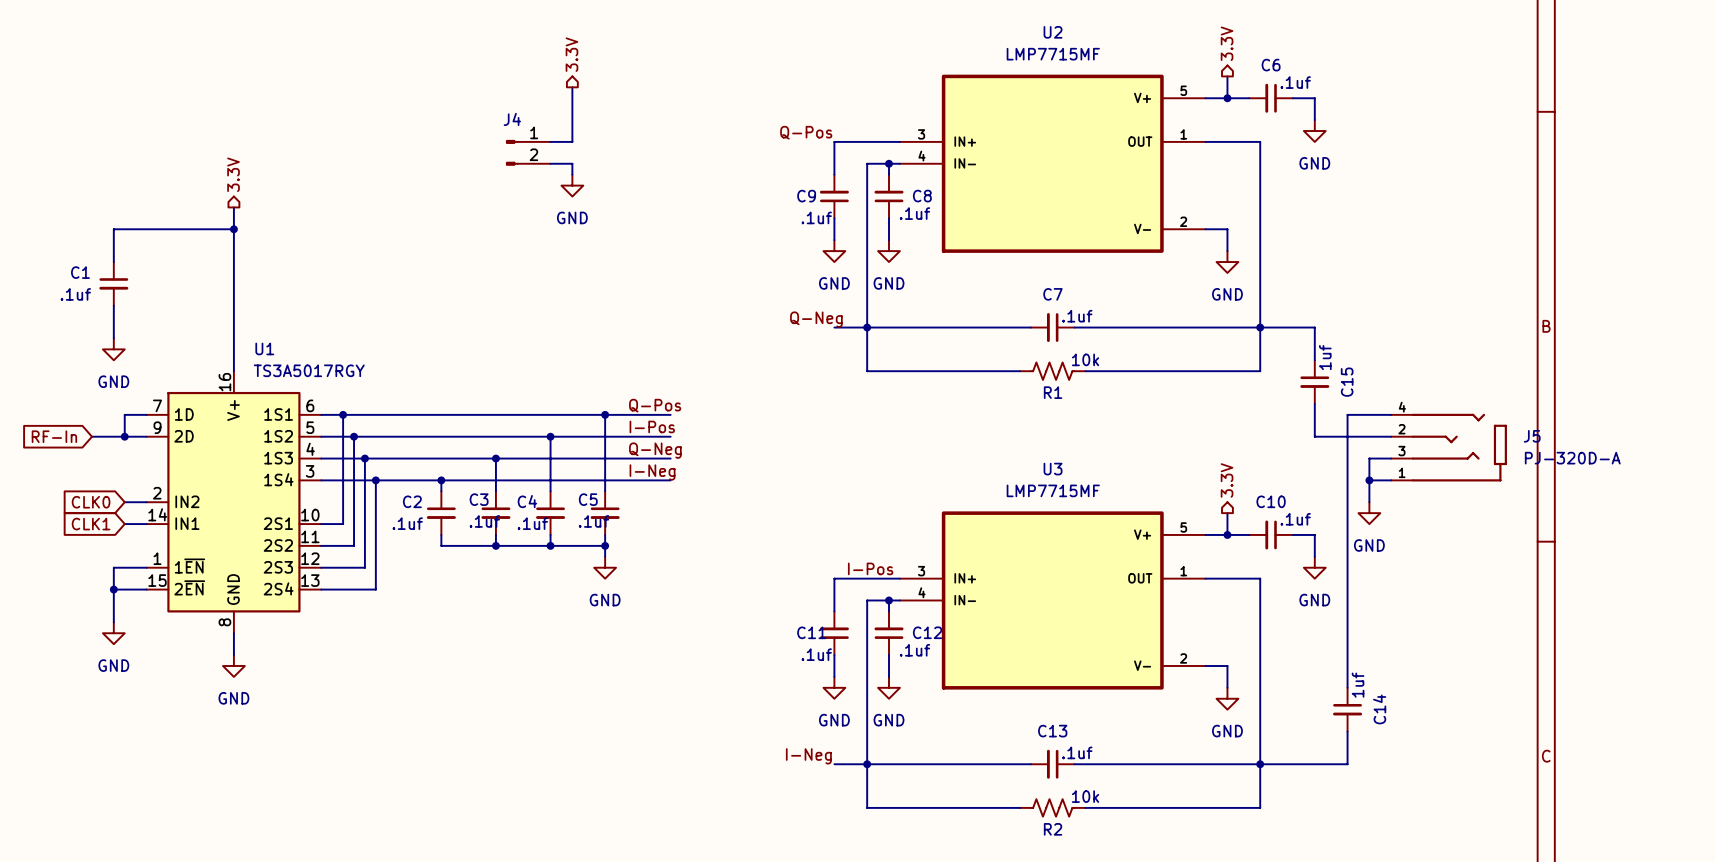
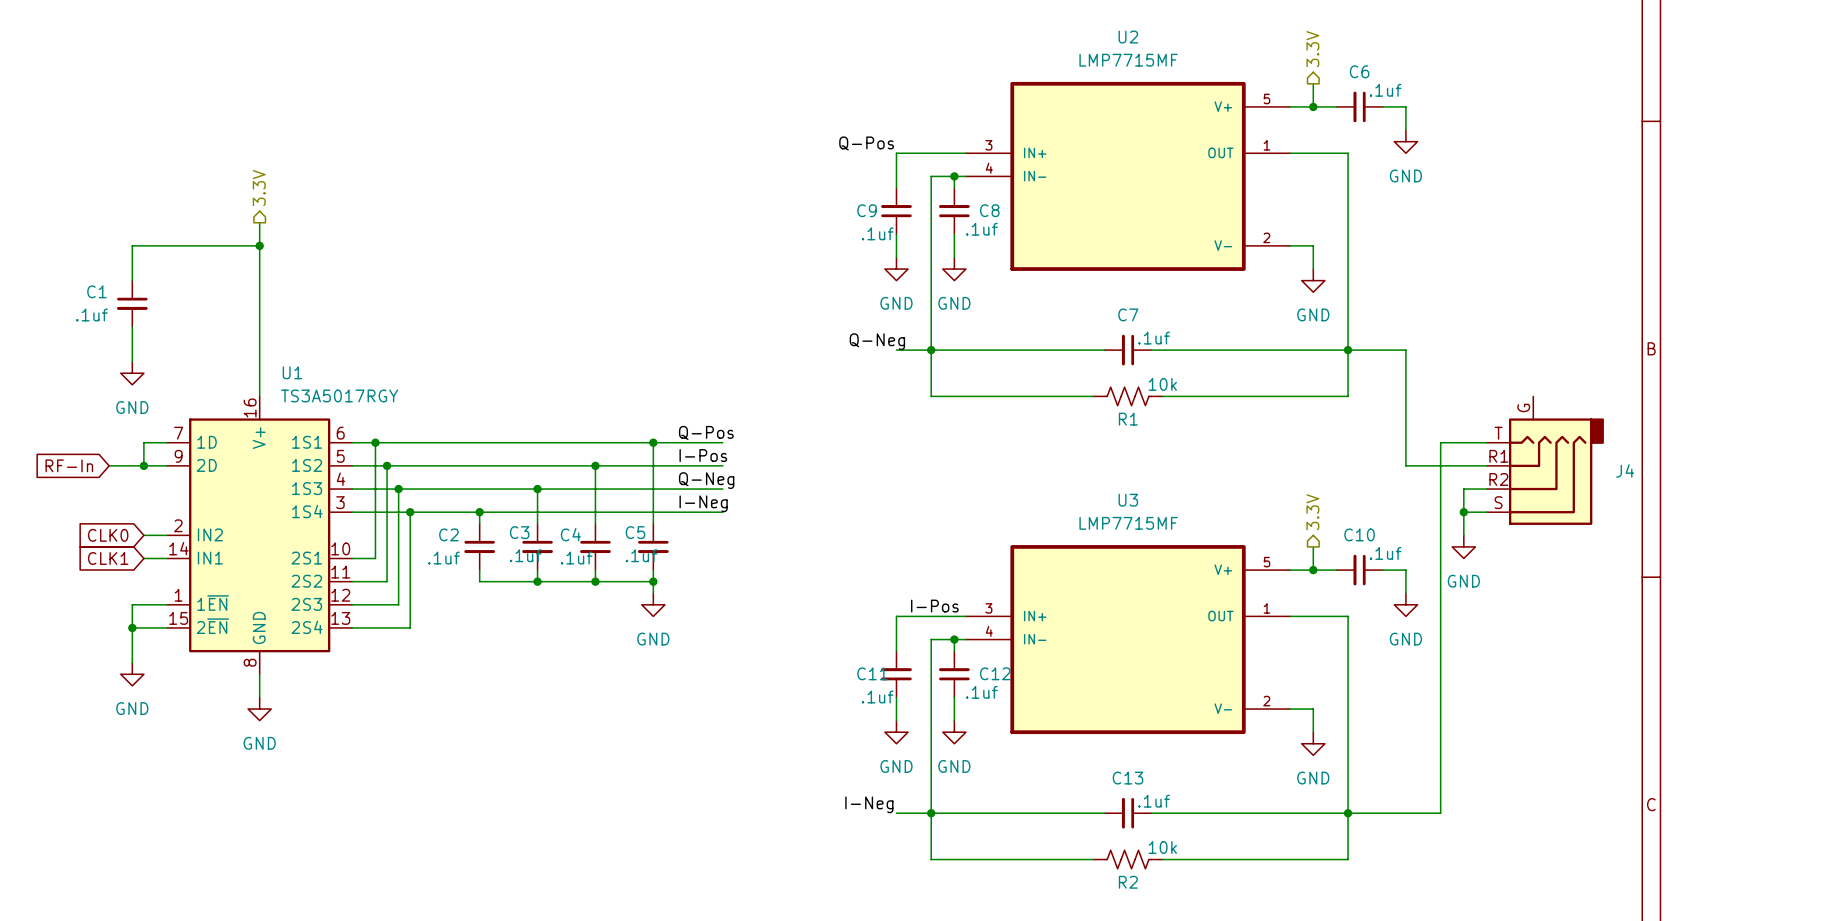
hierarchical label: 3.3V (571, 54) -> none
wire: (572, 87) (572, 141) (550, 141) -> none
J4 name position: J4 (512, 119) -> J4 (1625, 470)
J4 symbol: [506, 140, 551, 166] -> [1486, 396, 1604, 525]
wire: (550, 163) (572, 163) (572, 174) -> none
power symbol: GND (572, 185) -> none
C15: 1uf (1314, 382) -> none
J5: PJ-320D-A (1449, 447) -> none
C14: 1uf (1347, 709) -> none

